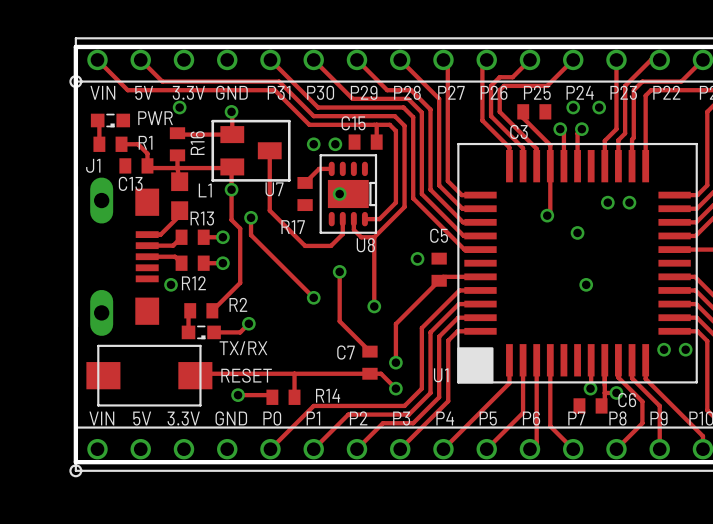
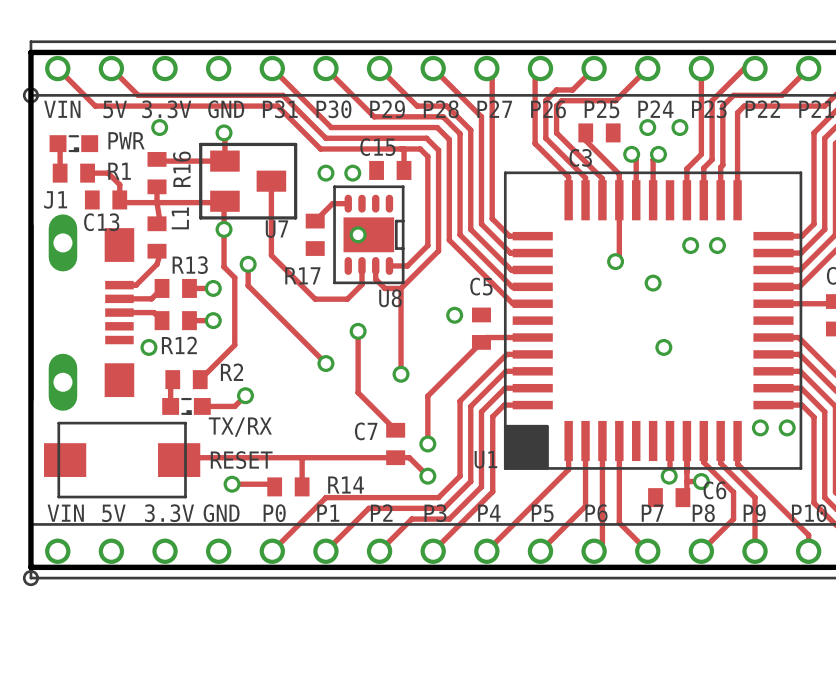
L1 footprint: [171, 172, 189, 221] -> [147, 216, 167, 259]
L1 name rotation: 0° (205, 190) -> 90° counterclockwise (180, 218)

